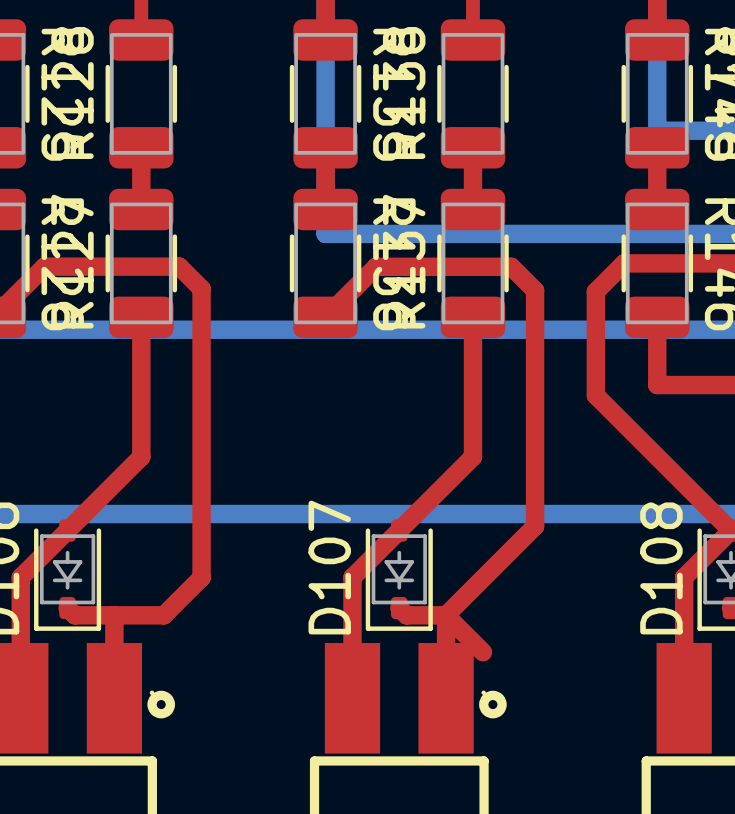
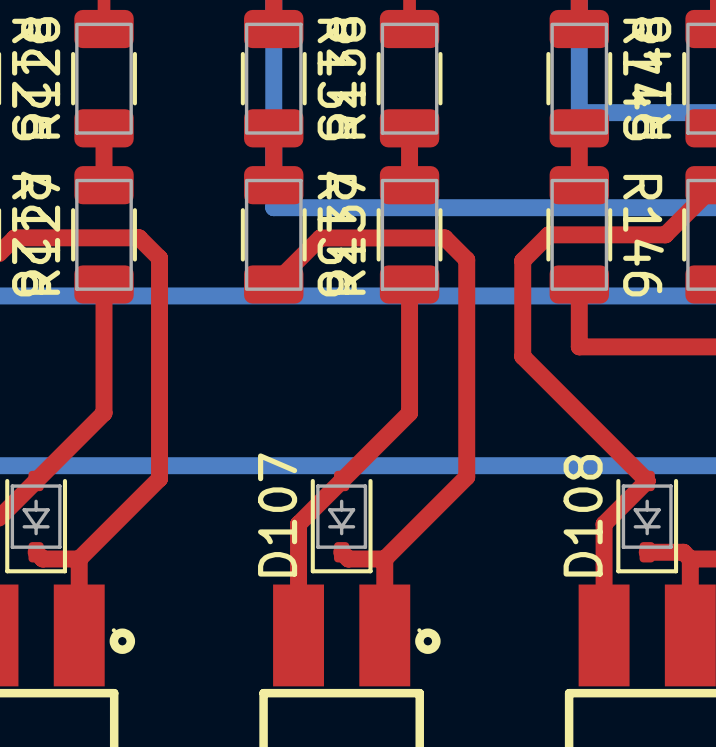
top track: (201, 528) (201, 577) (163, 615) (114, 615) -> (159, 478) (79, 559)
top track: (446, 615) (483, 652) -> none

